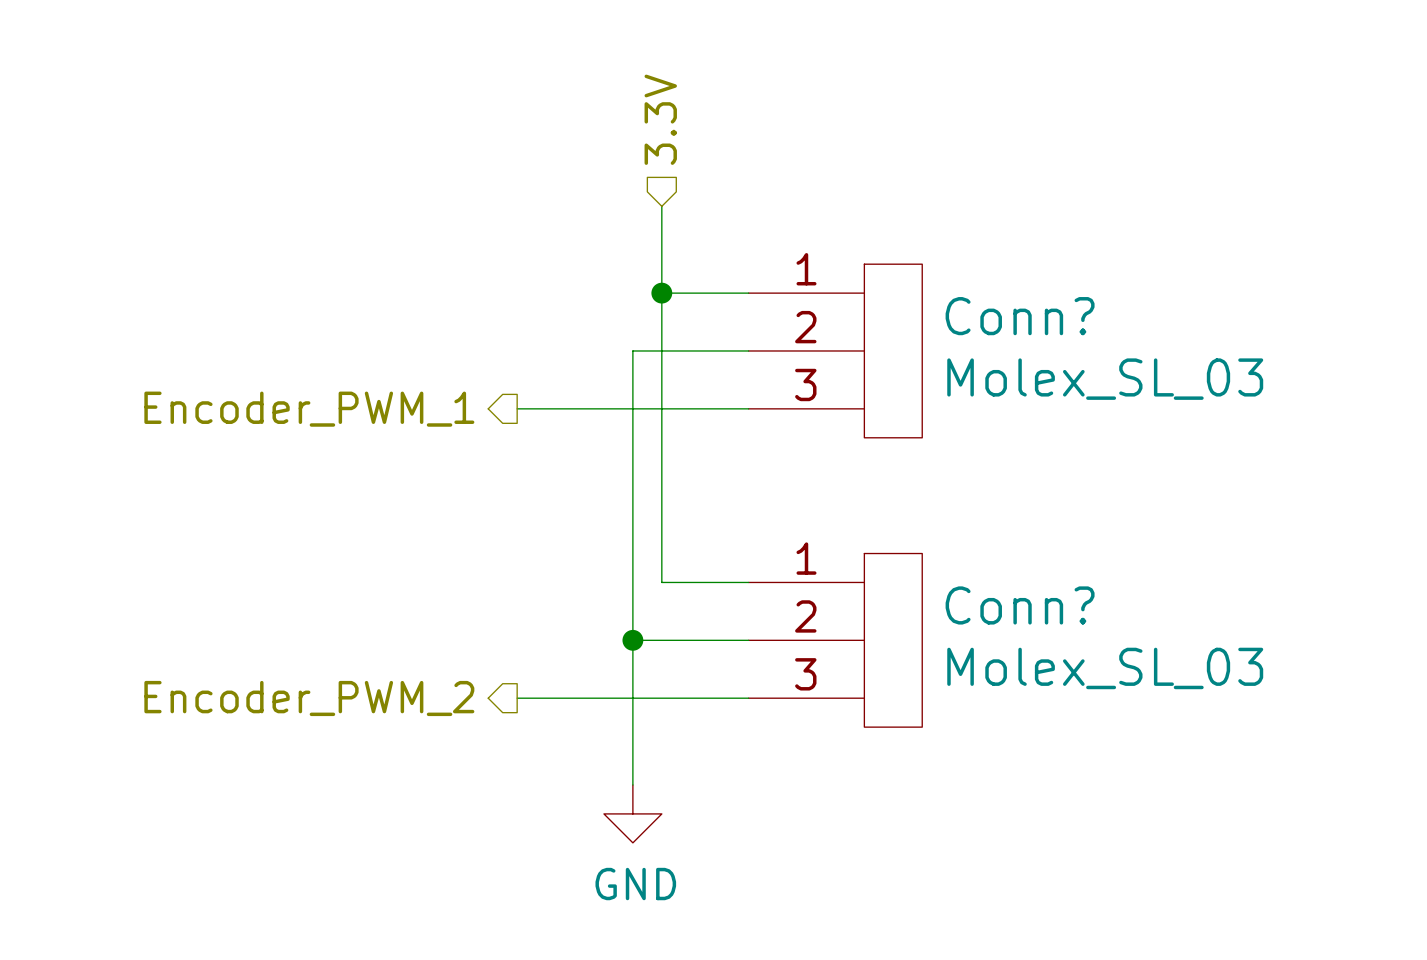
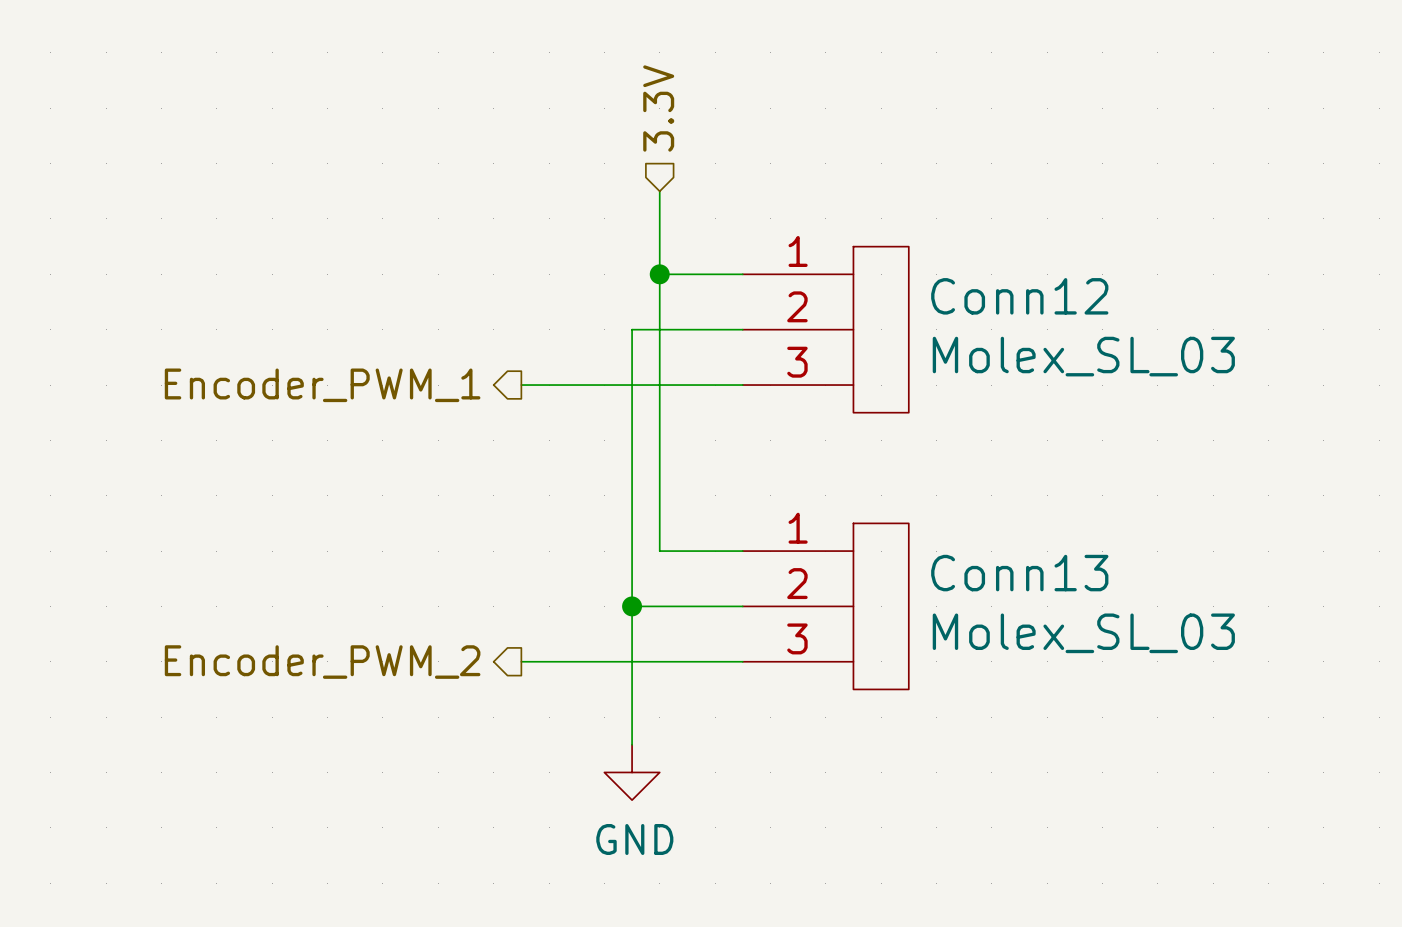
Conn? name: Conn? (1020, 316) -> Conn12 (1019, 296)
Conn? name: Conn? (1020, 605) -> Conn13 (1019, 573)

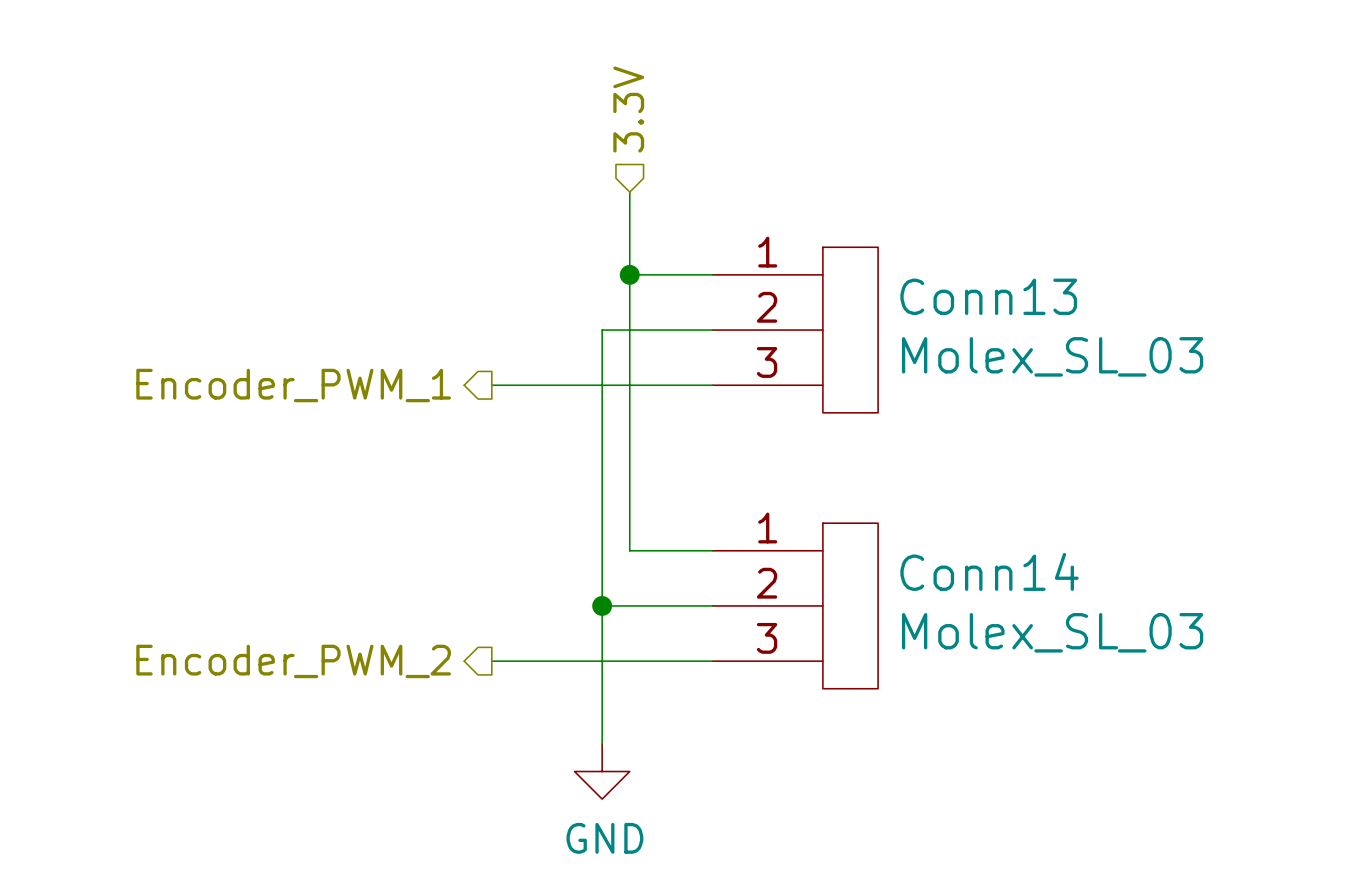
Conn12 name: Conn12 (1019, 296) -> Conn13 (988, 296)
Conn13 name: Conn13 (1019, 573) -> Conn14 (989, 571)

